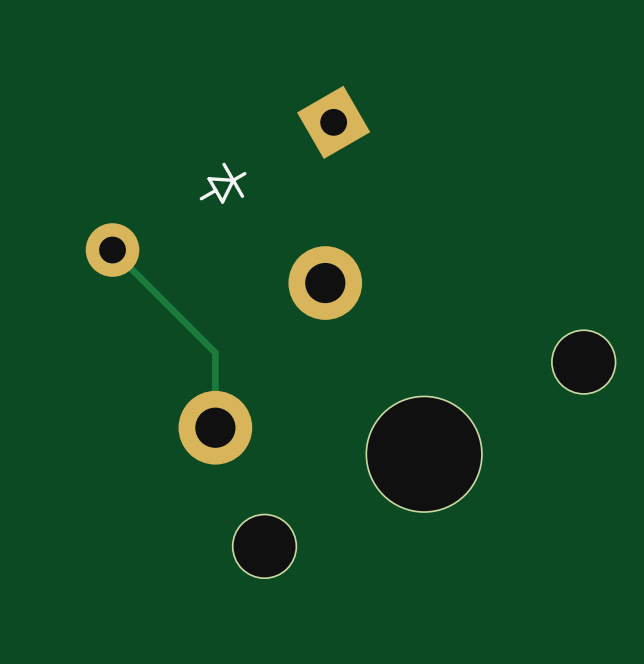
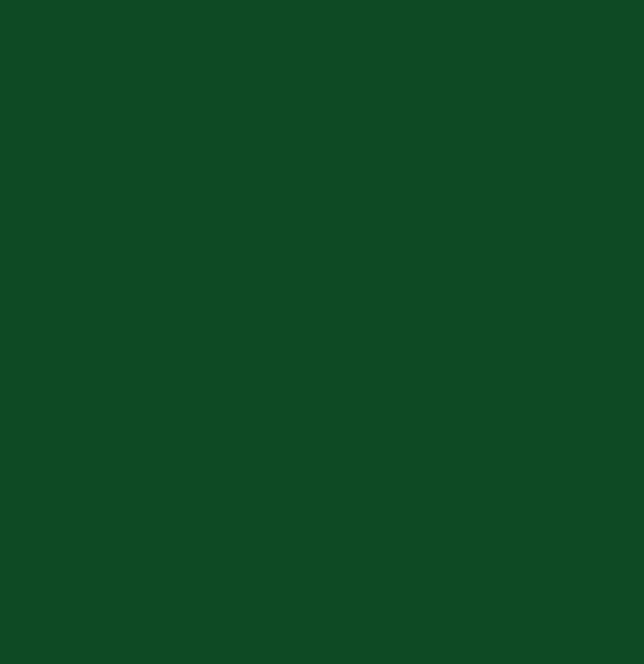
part: (228, 181) -> none
track: (112, 250) (215, 352) (215, 427) -> none
part: (397, 412) -> none

